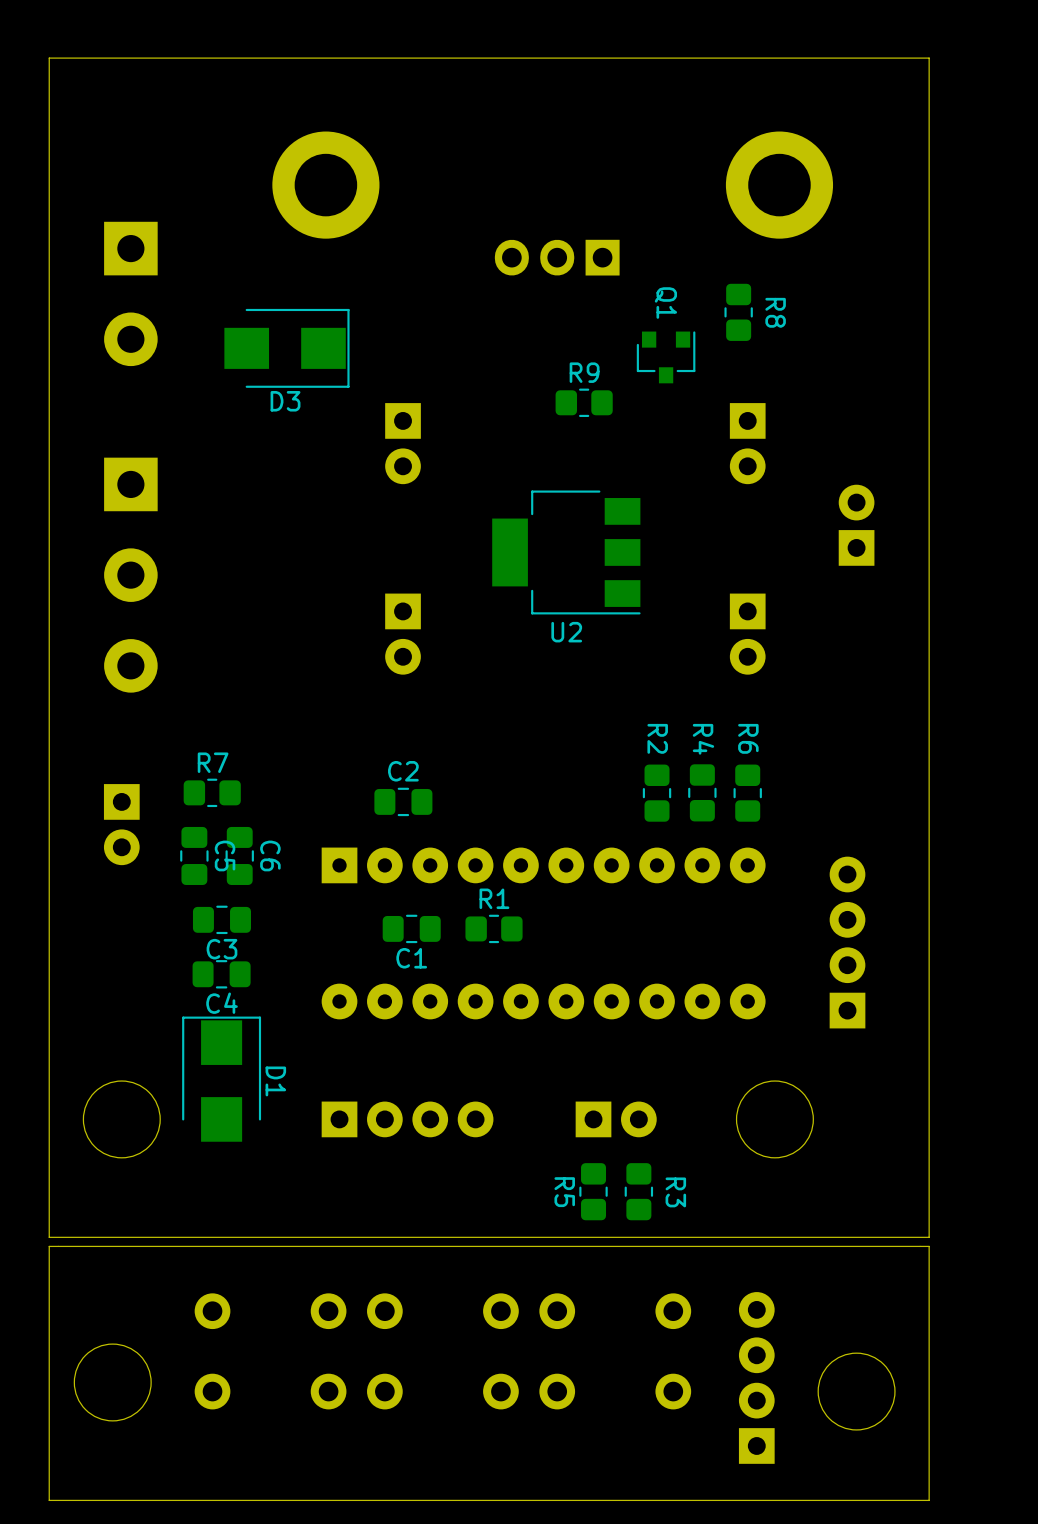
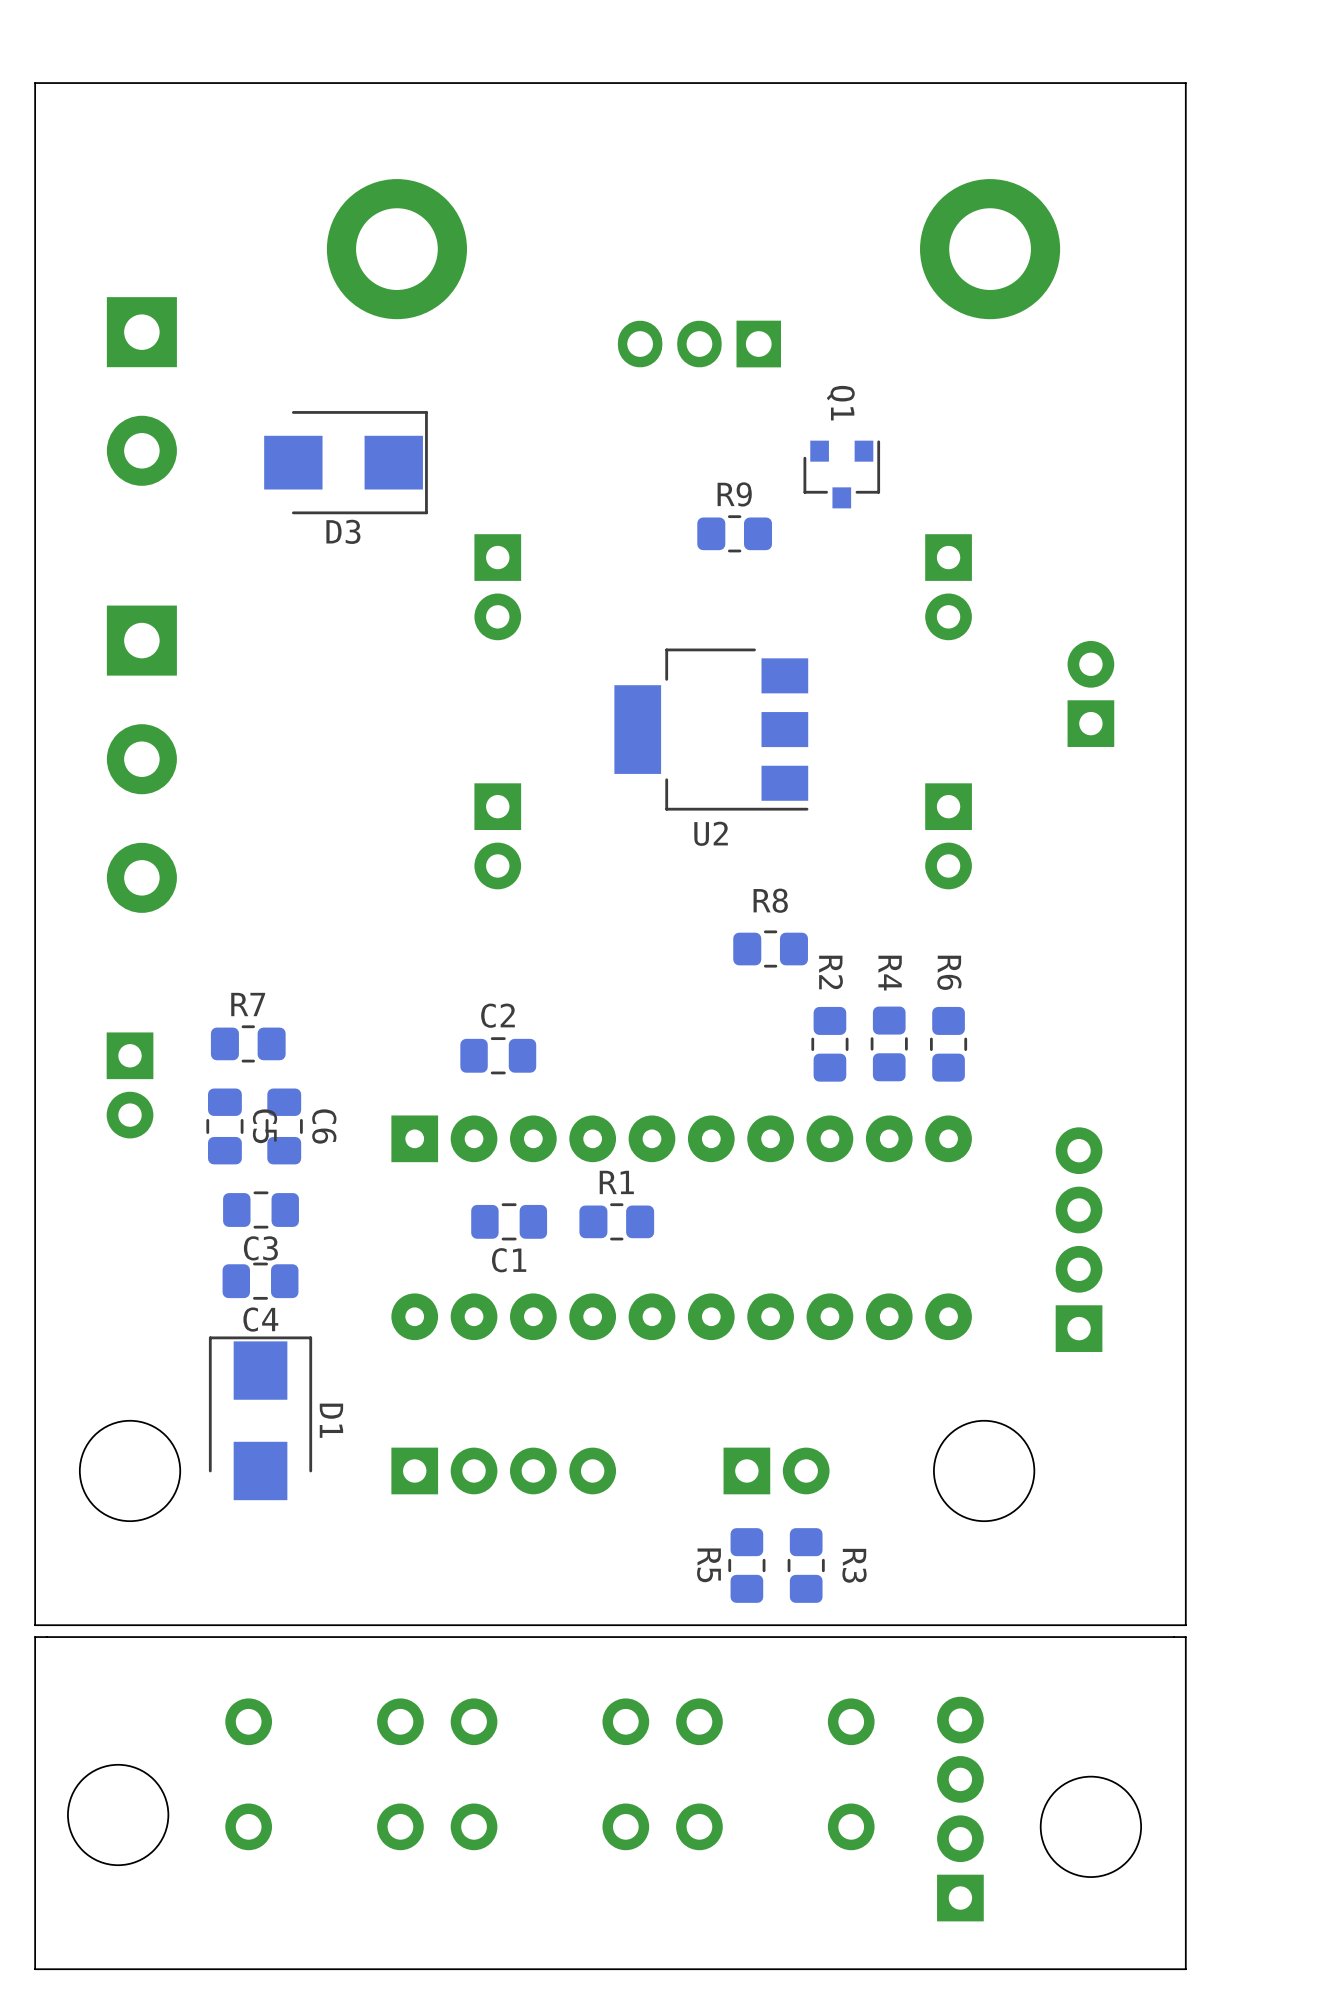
R8 rotation: 0° (738, 312) -> 90° clockwise (770, 949)
R8 position: (738, 312) -> (770, 949)
R8 name position: R8 (775, 312) -> R8 (770, 900)

